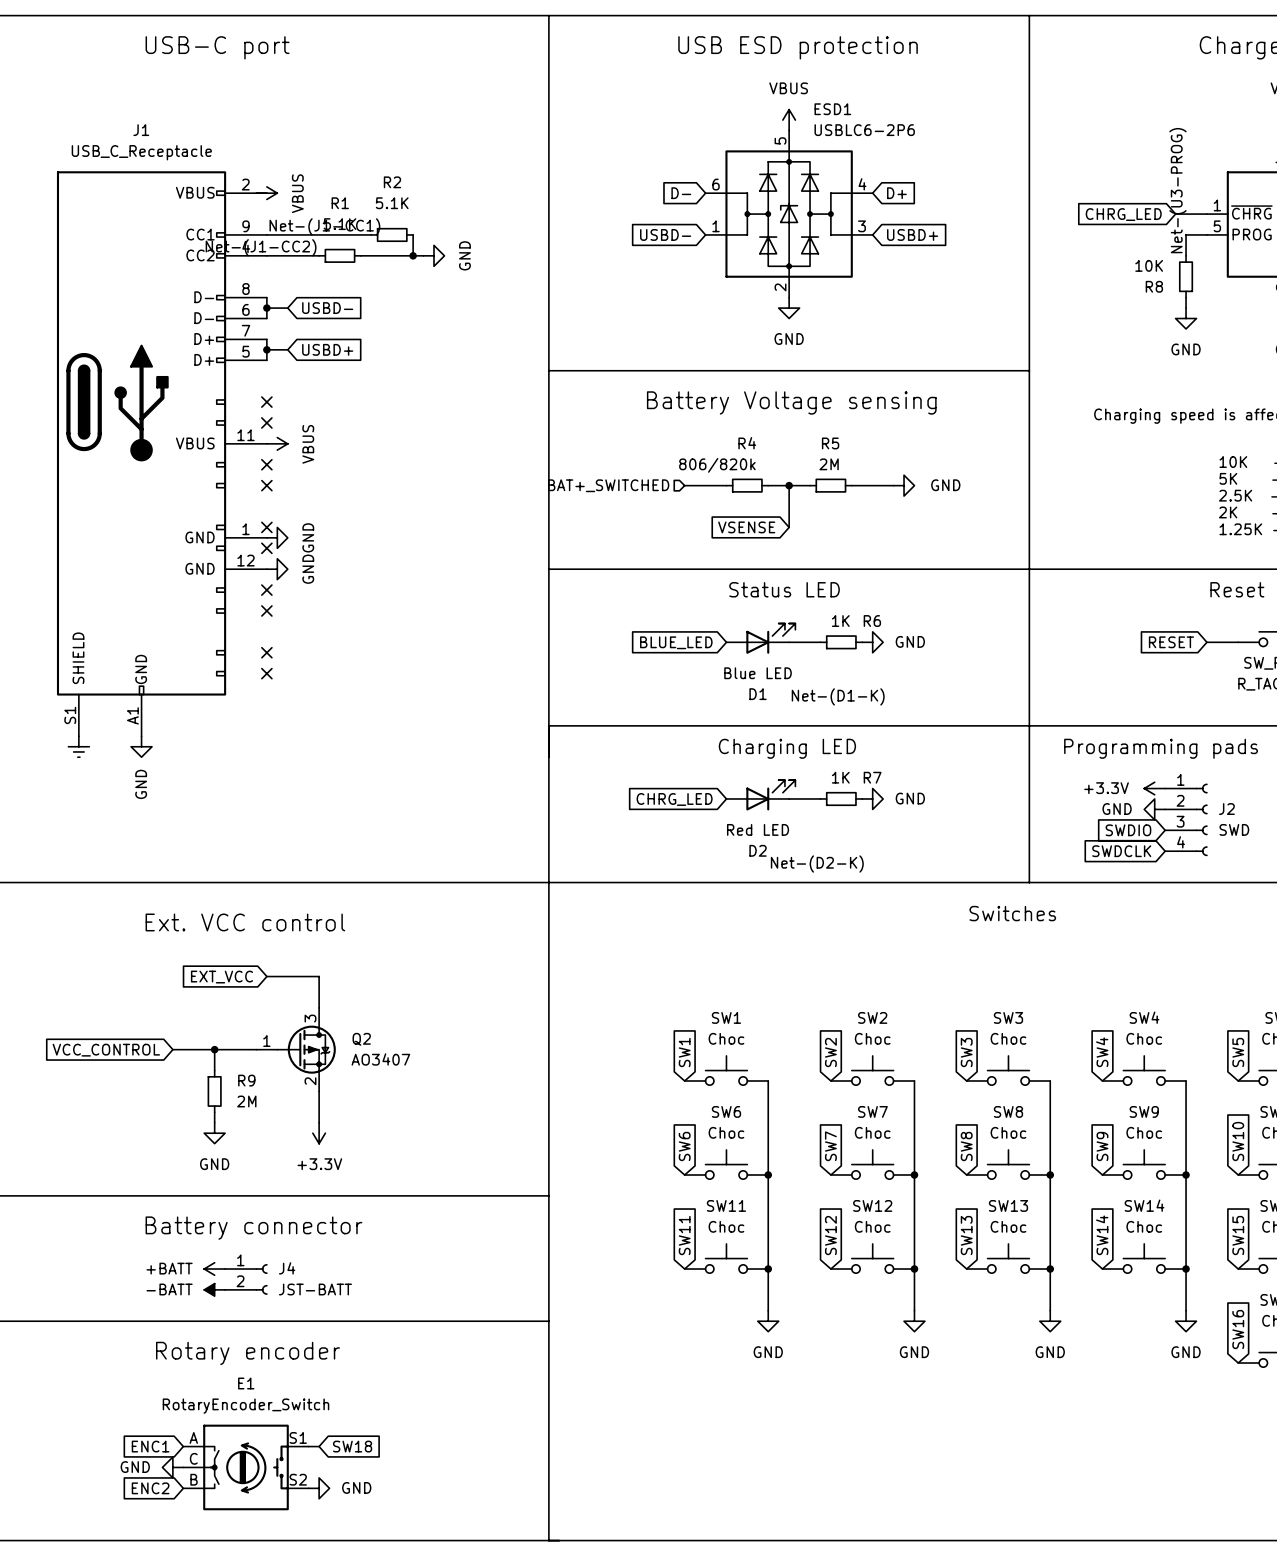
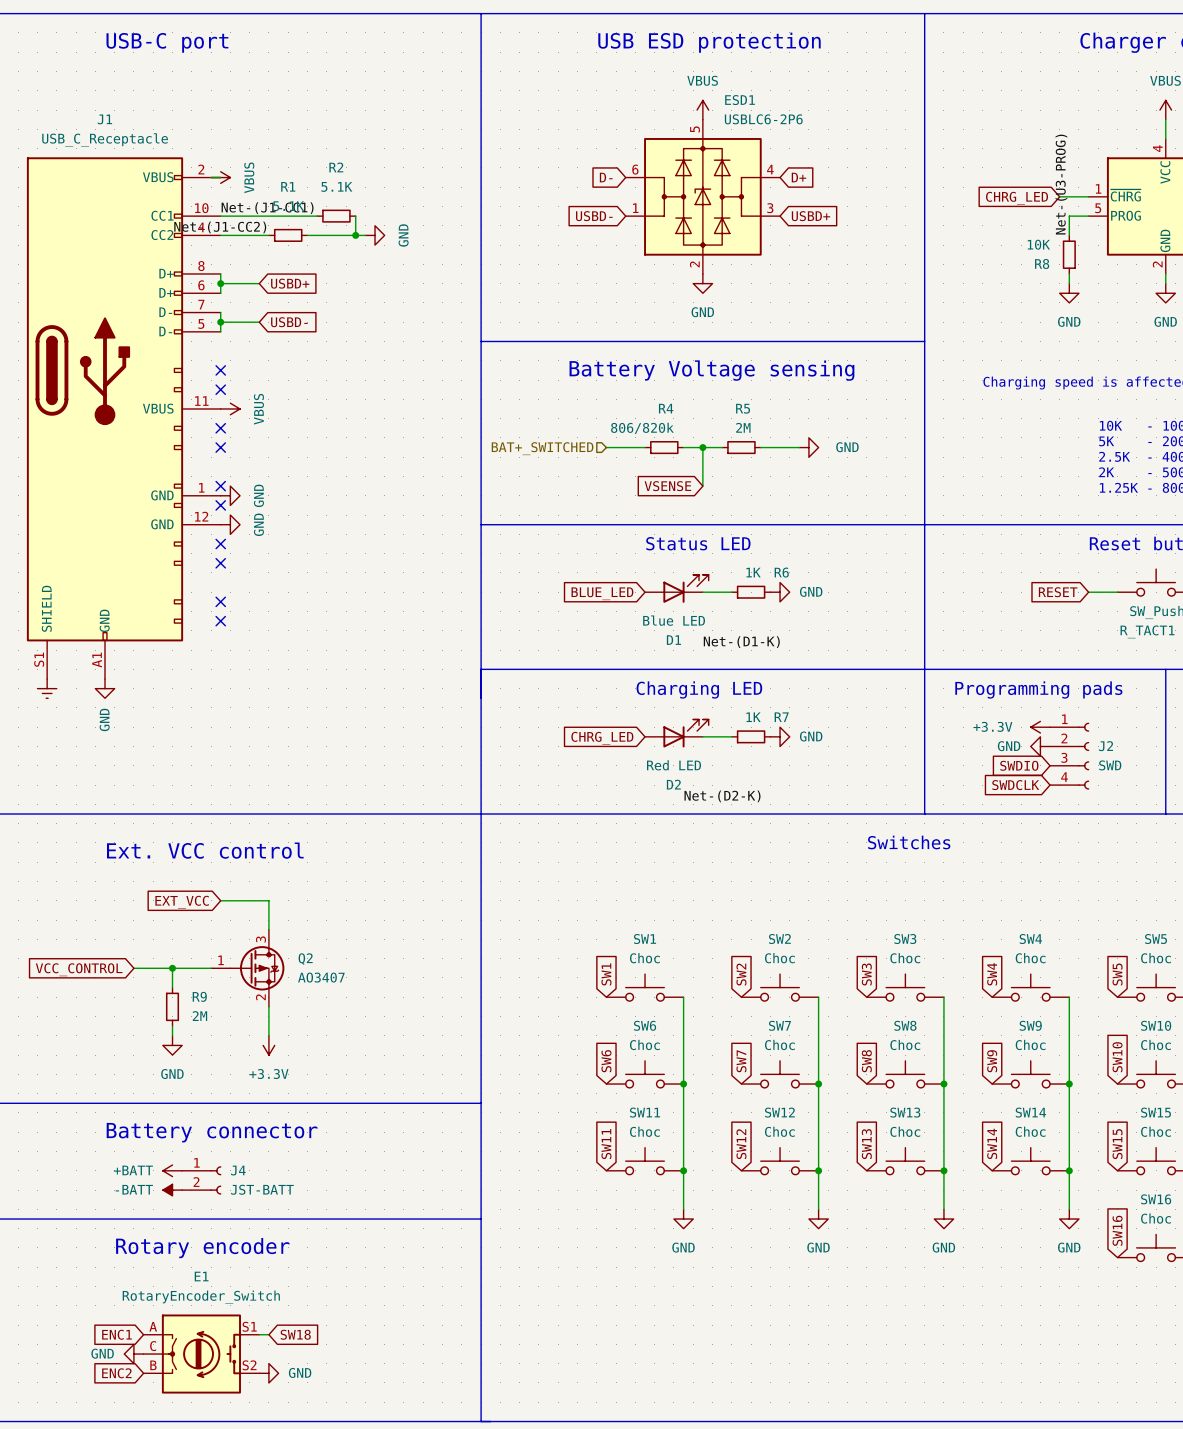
J1 pin number: 9 (245, 226) -> 10 (201, 208)
J1 pin name: D- (204, 297) -> D+ (166, 273)
wire: none -> (240, 283) (259, 283)
global label position: USBD- (327, 308) -> USBD- (289, 322)
J1 pin name: D- (204, 318) -> D+ (166, 292)
J1 pin name: D+ (204, 339) -> D- (165, 312)
wire: none -> (240, 322) (259, 322)
global label position: USBD+ (327, 349) -> USBD+ (290, 283)
J1 pin name: D+ (204, 359) -> D- (165, 331)

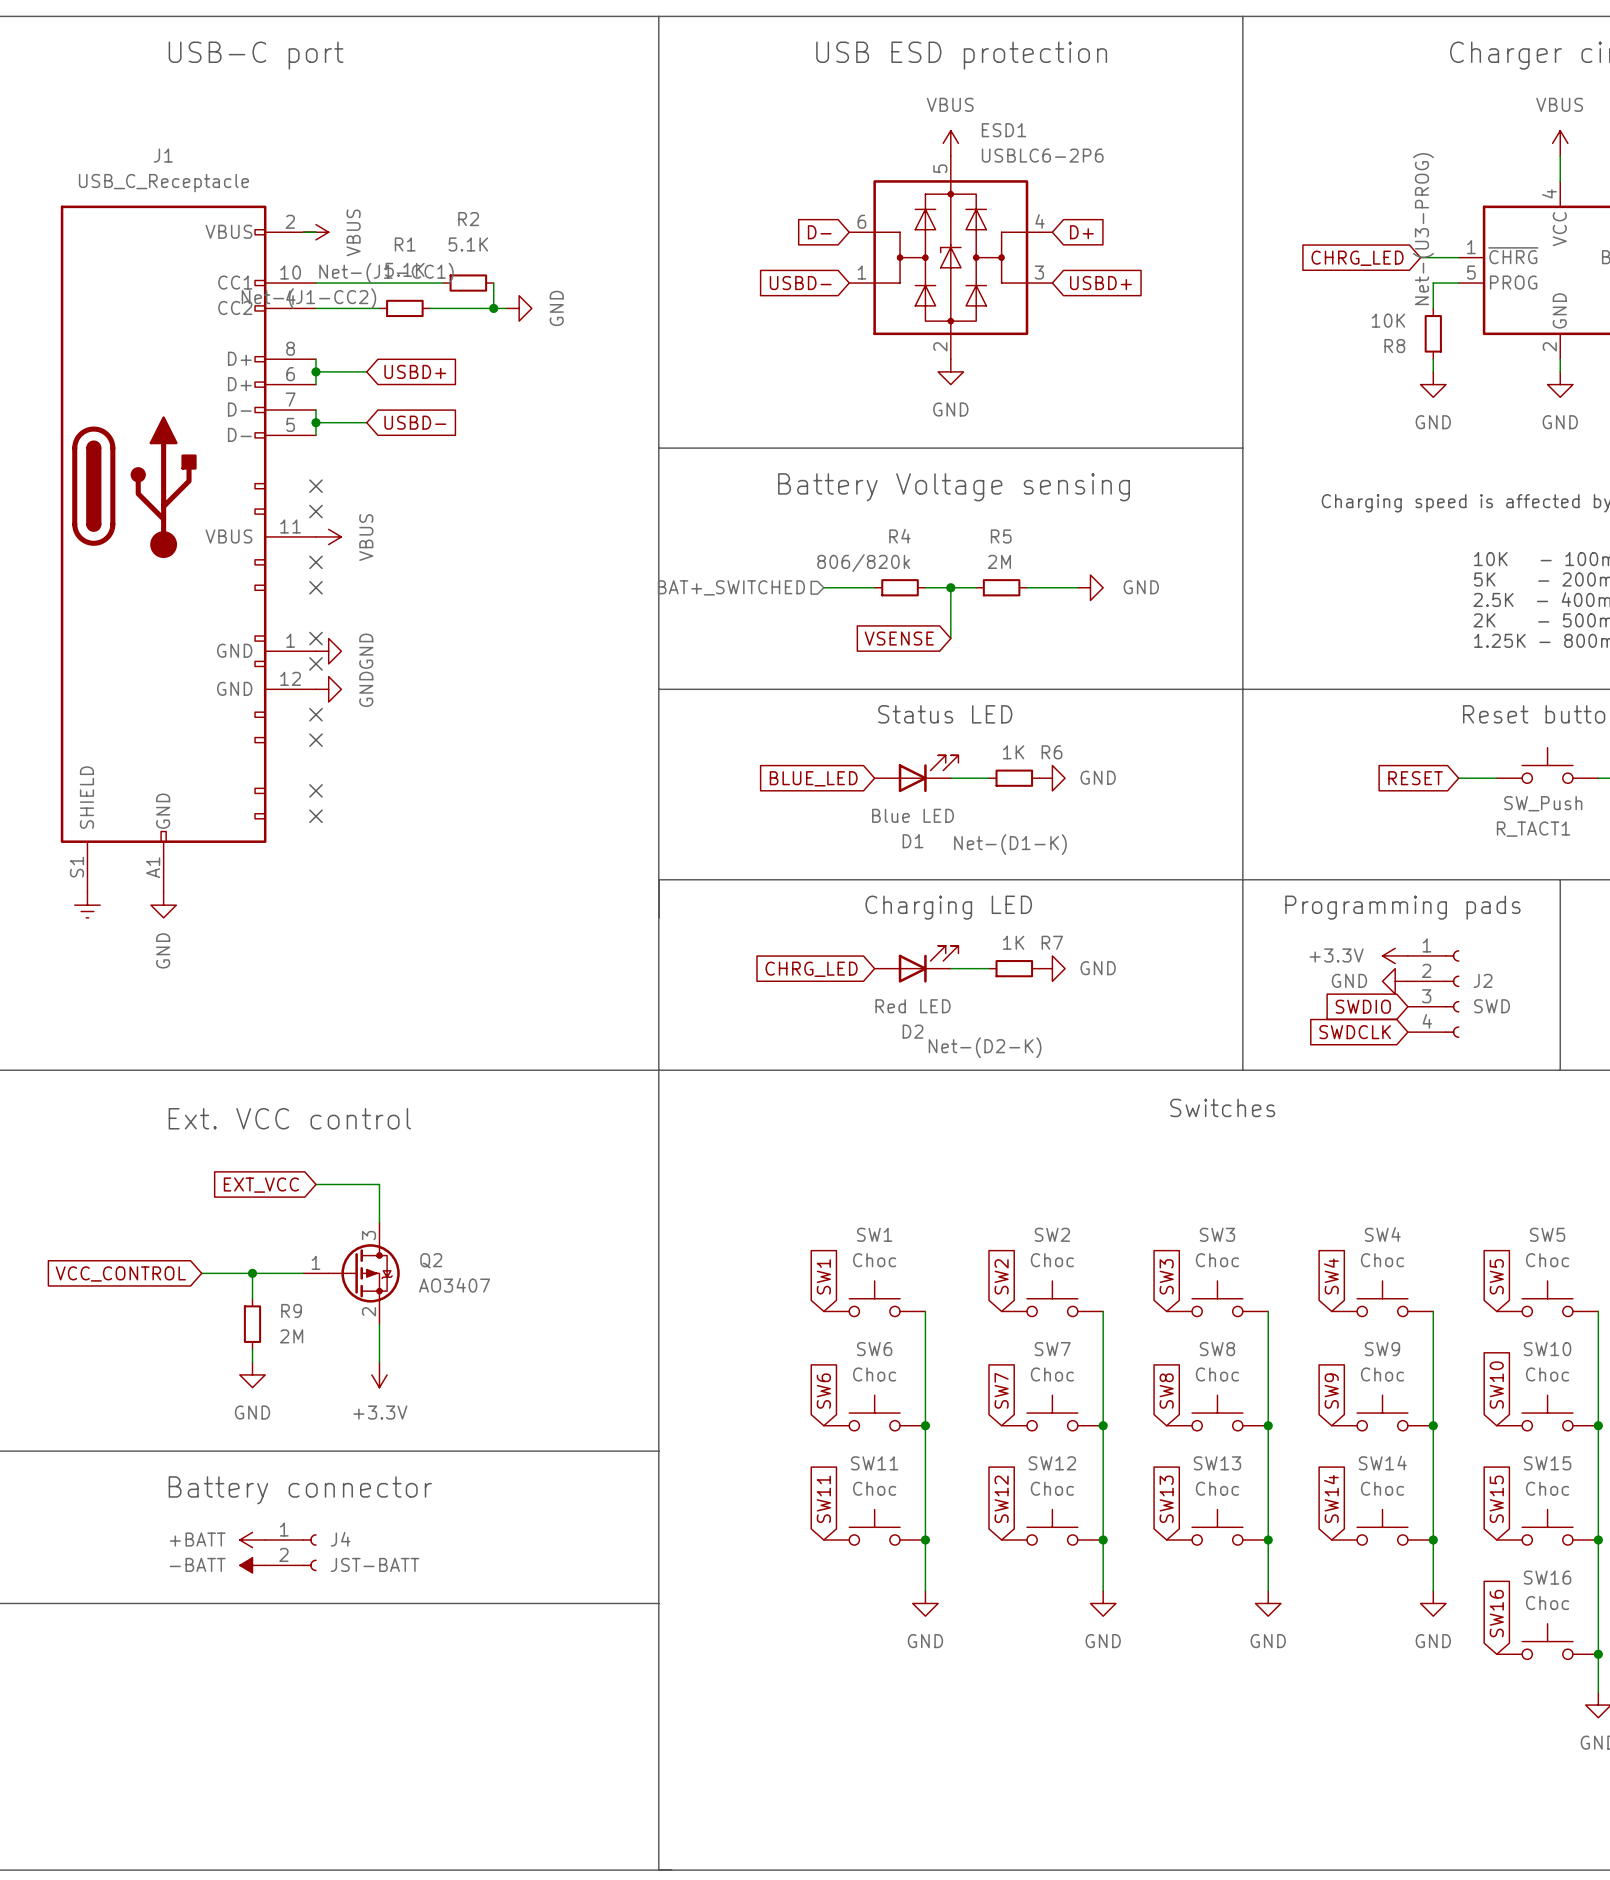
text: Rotary encoder (202, 1248) -> none
global label: ENC1 (116, 1334) -> none
wire: (259, 1334) (268, 1334) -> none
global label: SW18 (295, 1334) -> none
power symbol: GND (133, 1354) -> none
E1: RotaryEncoder_Switch (201, 1354) -> none
global label: ENC2 (116, 1373) -> none
power symbol: GND (268, 1373) -> none

